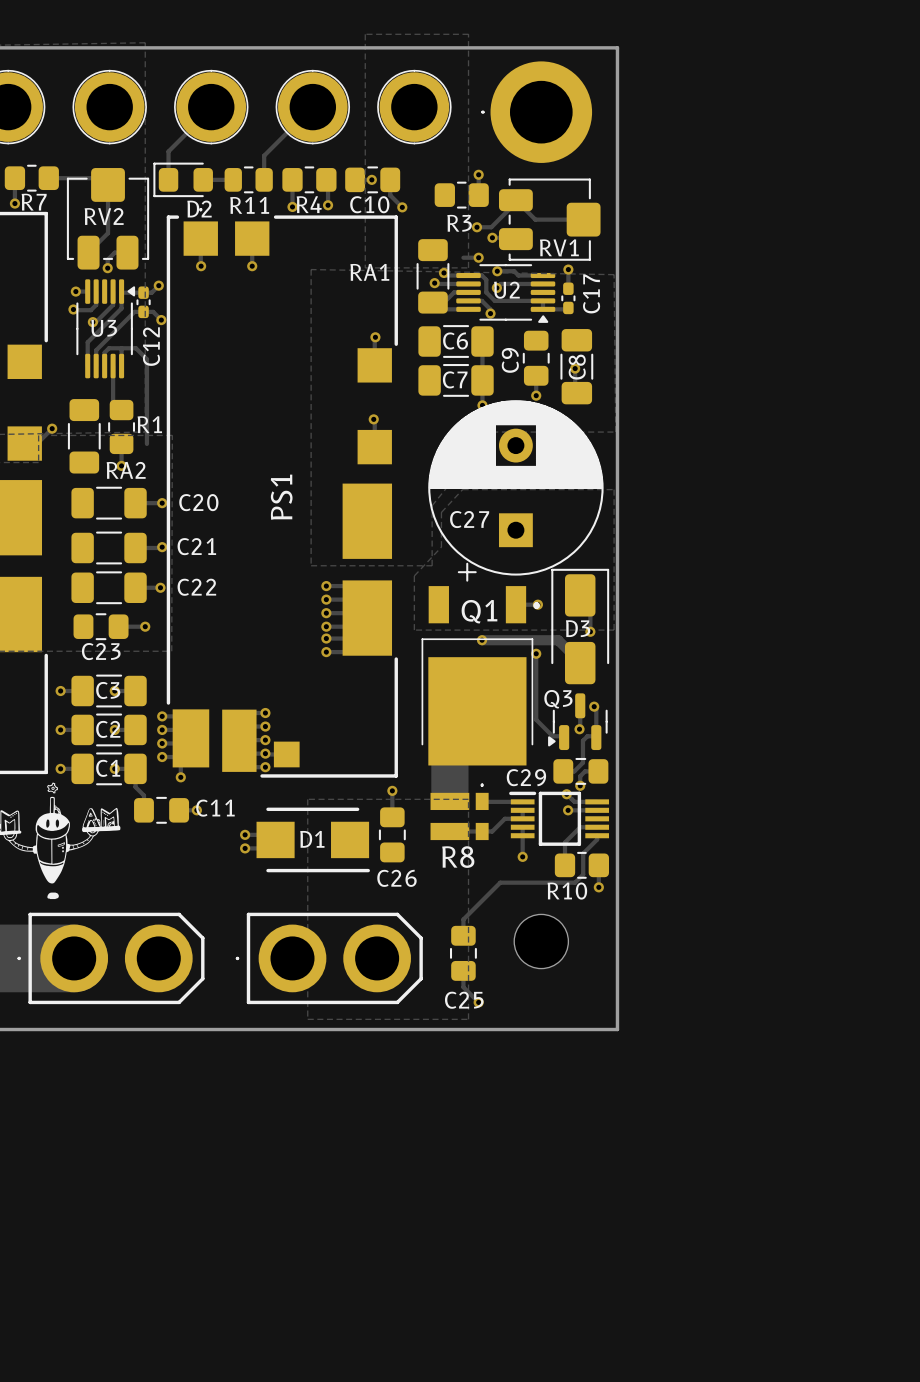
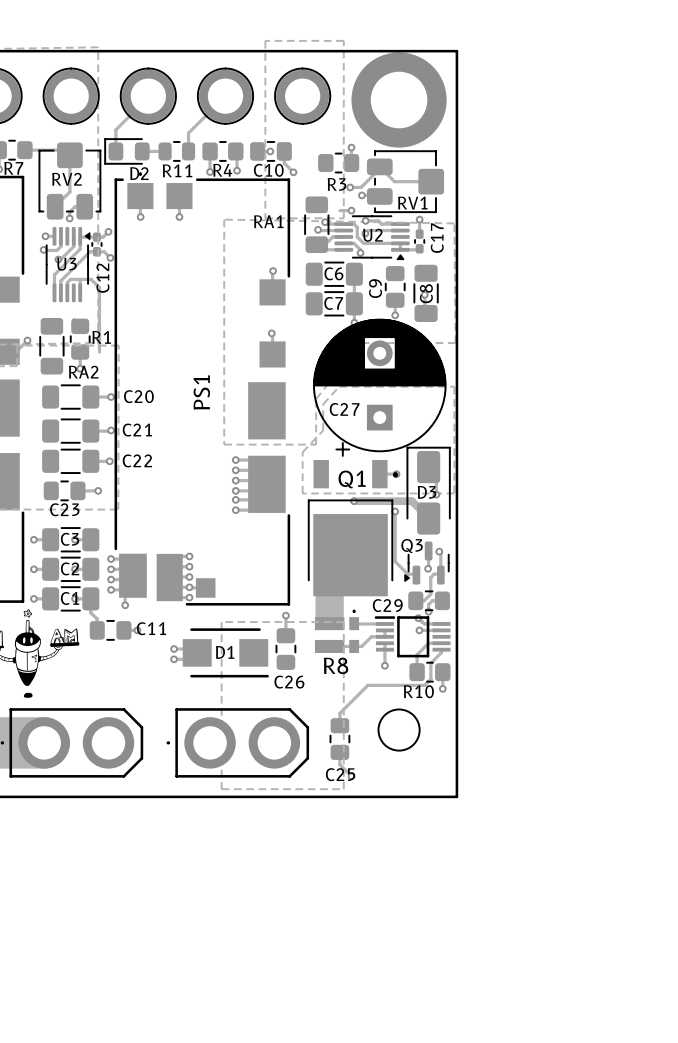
part footprint: [481, 61, 593, 163] -> [351, 52, 447, 148]
track: (113, 366) (113, 401) -> none

